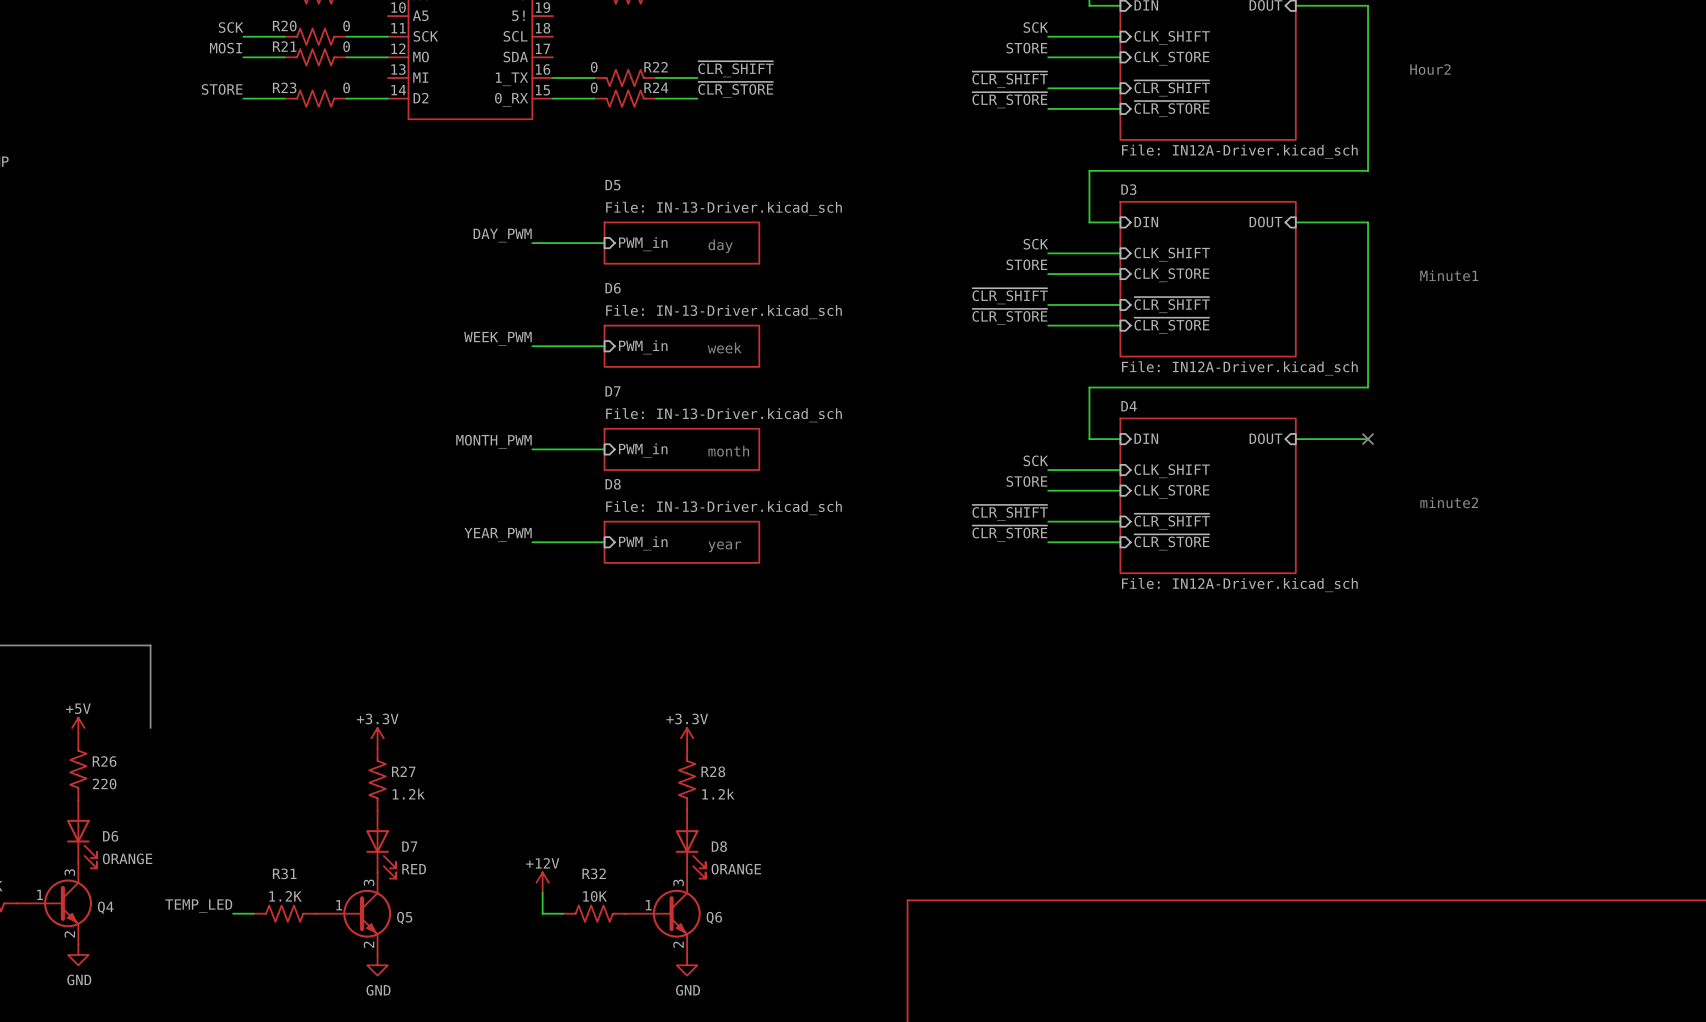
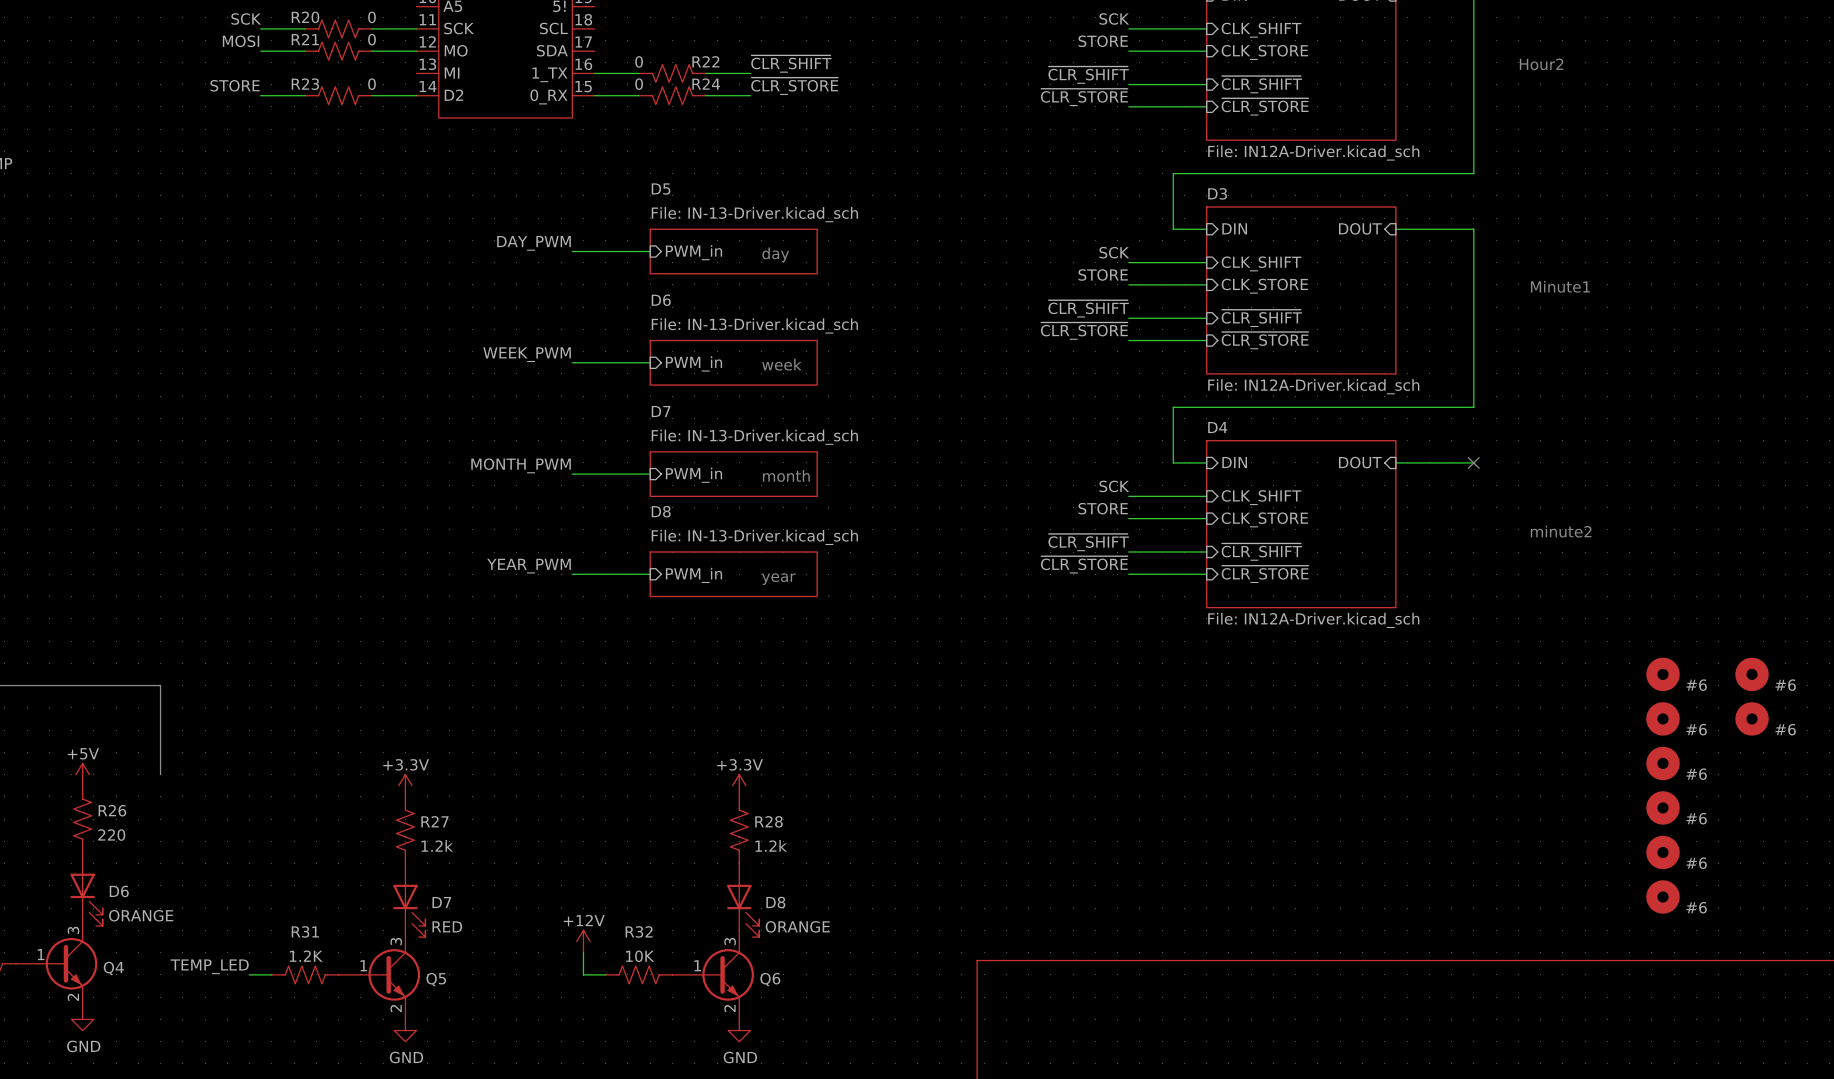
part: none -> #6 (1662, 674)
part: none -> #6 (1752, 674)
part: none -> #6 (1662, 718)
part: none -> #6 (1752, 718)
part: none -> #6 (1662, 763)
part: none -> #6 (1662, 807)
part: none -> #6 (1662, 852)
part: none -> #6 (1662, 897)

